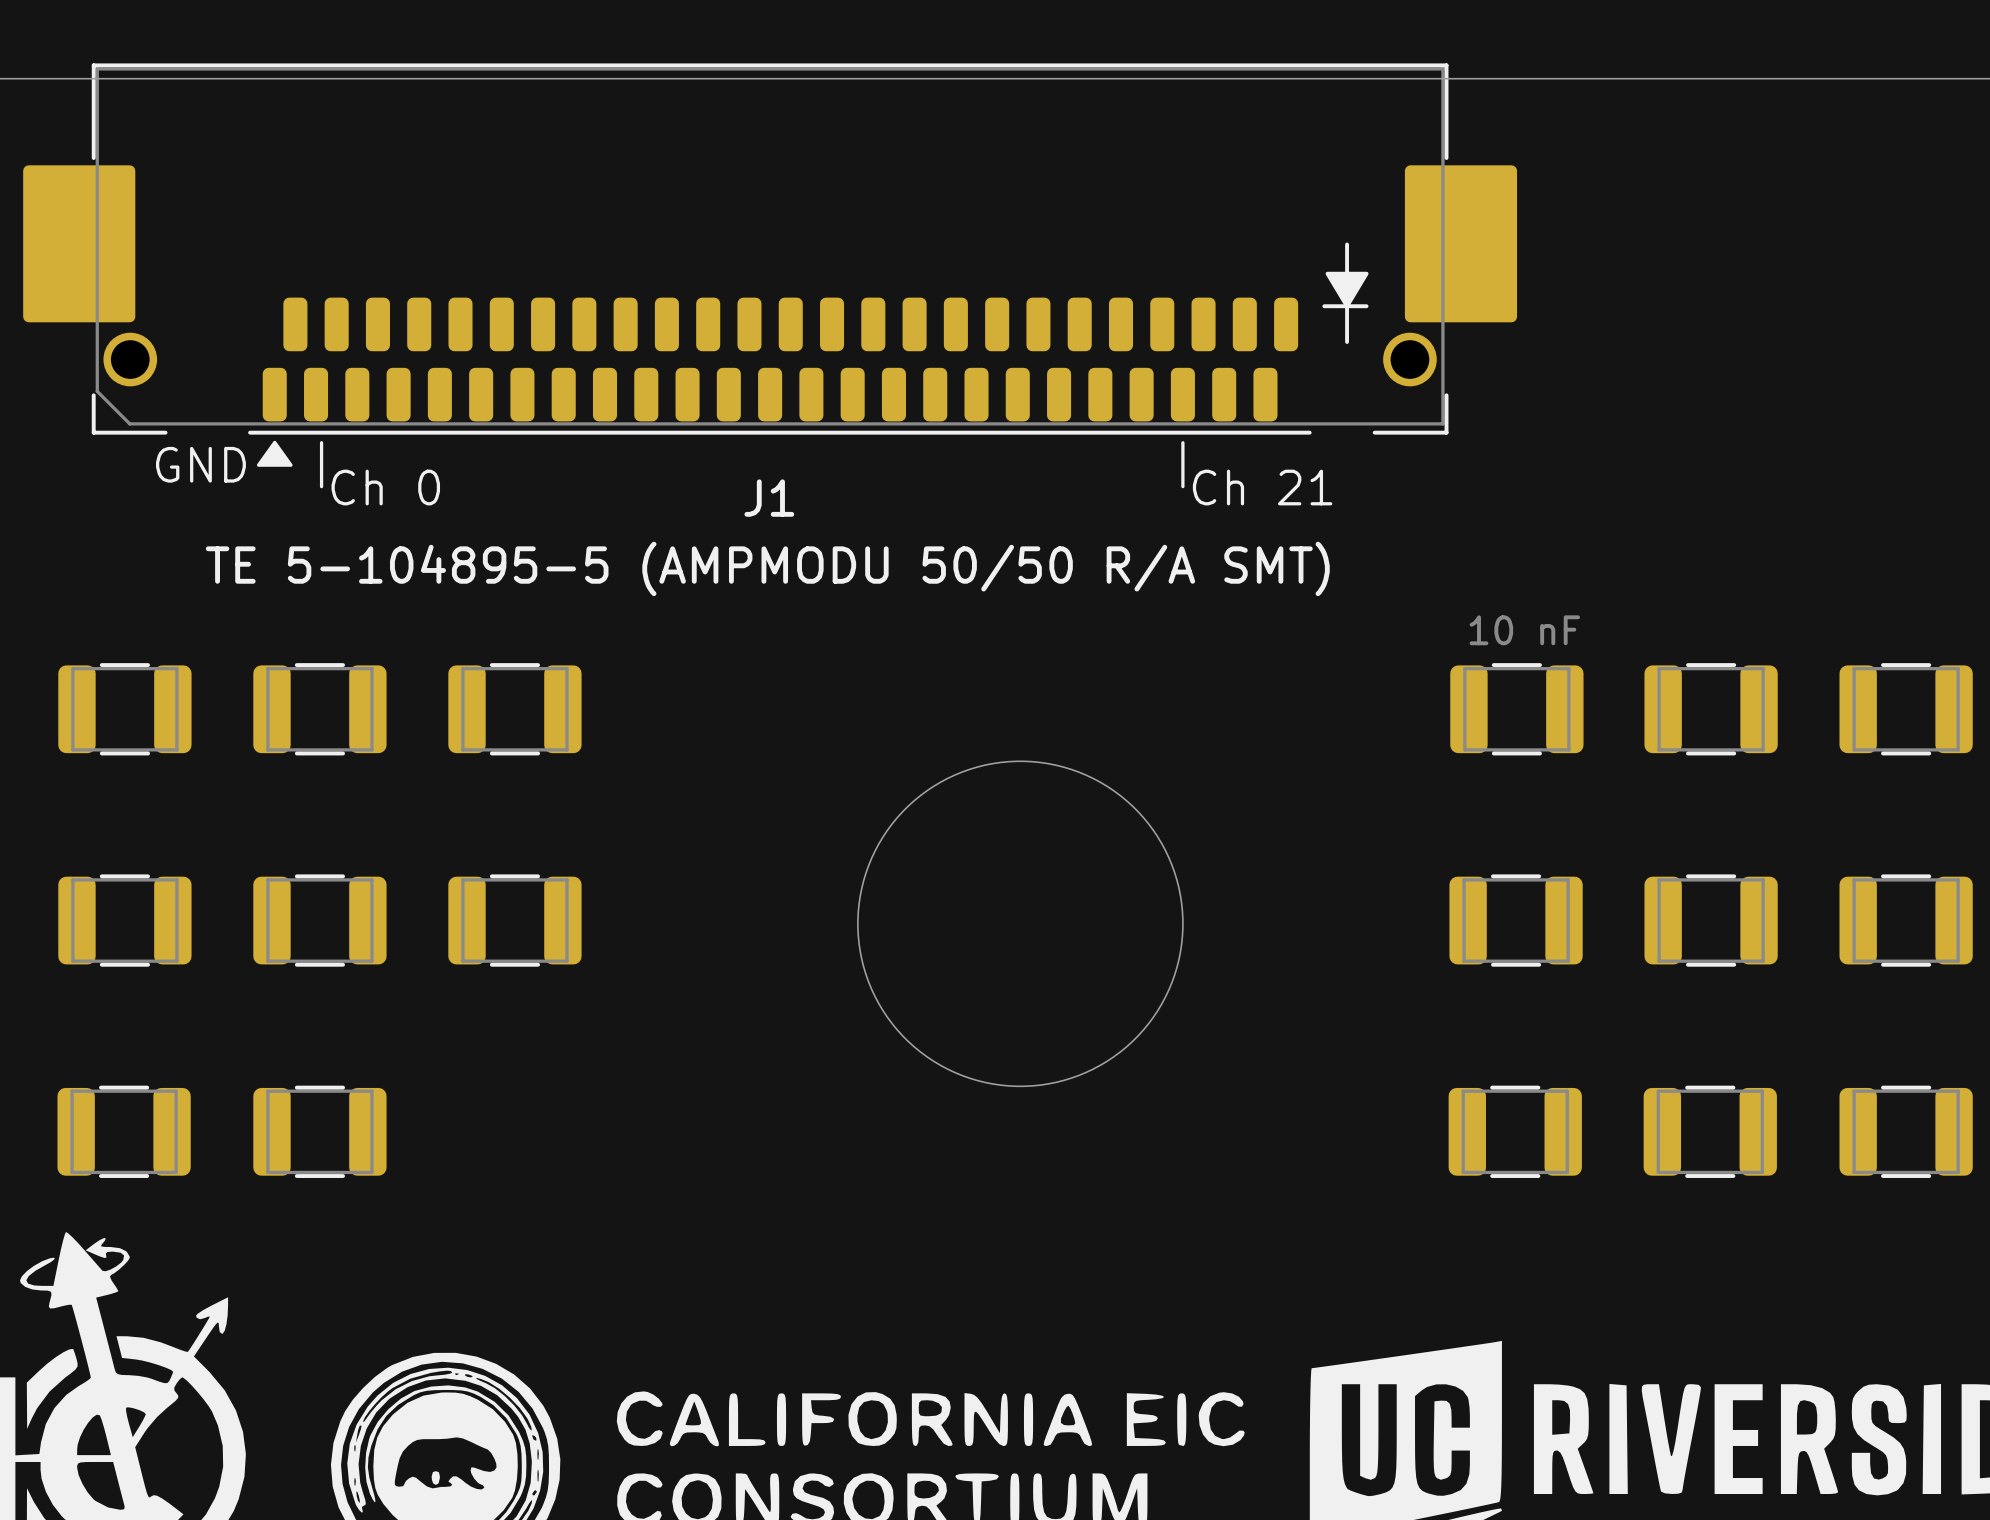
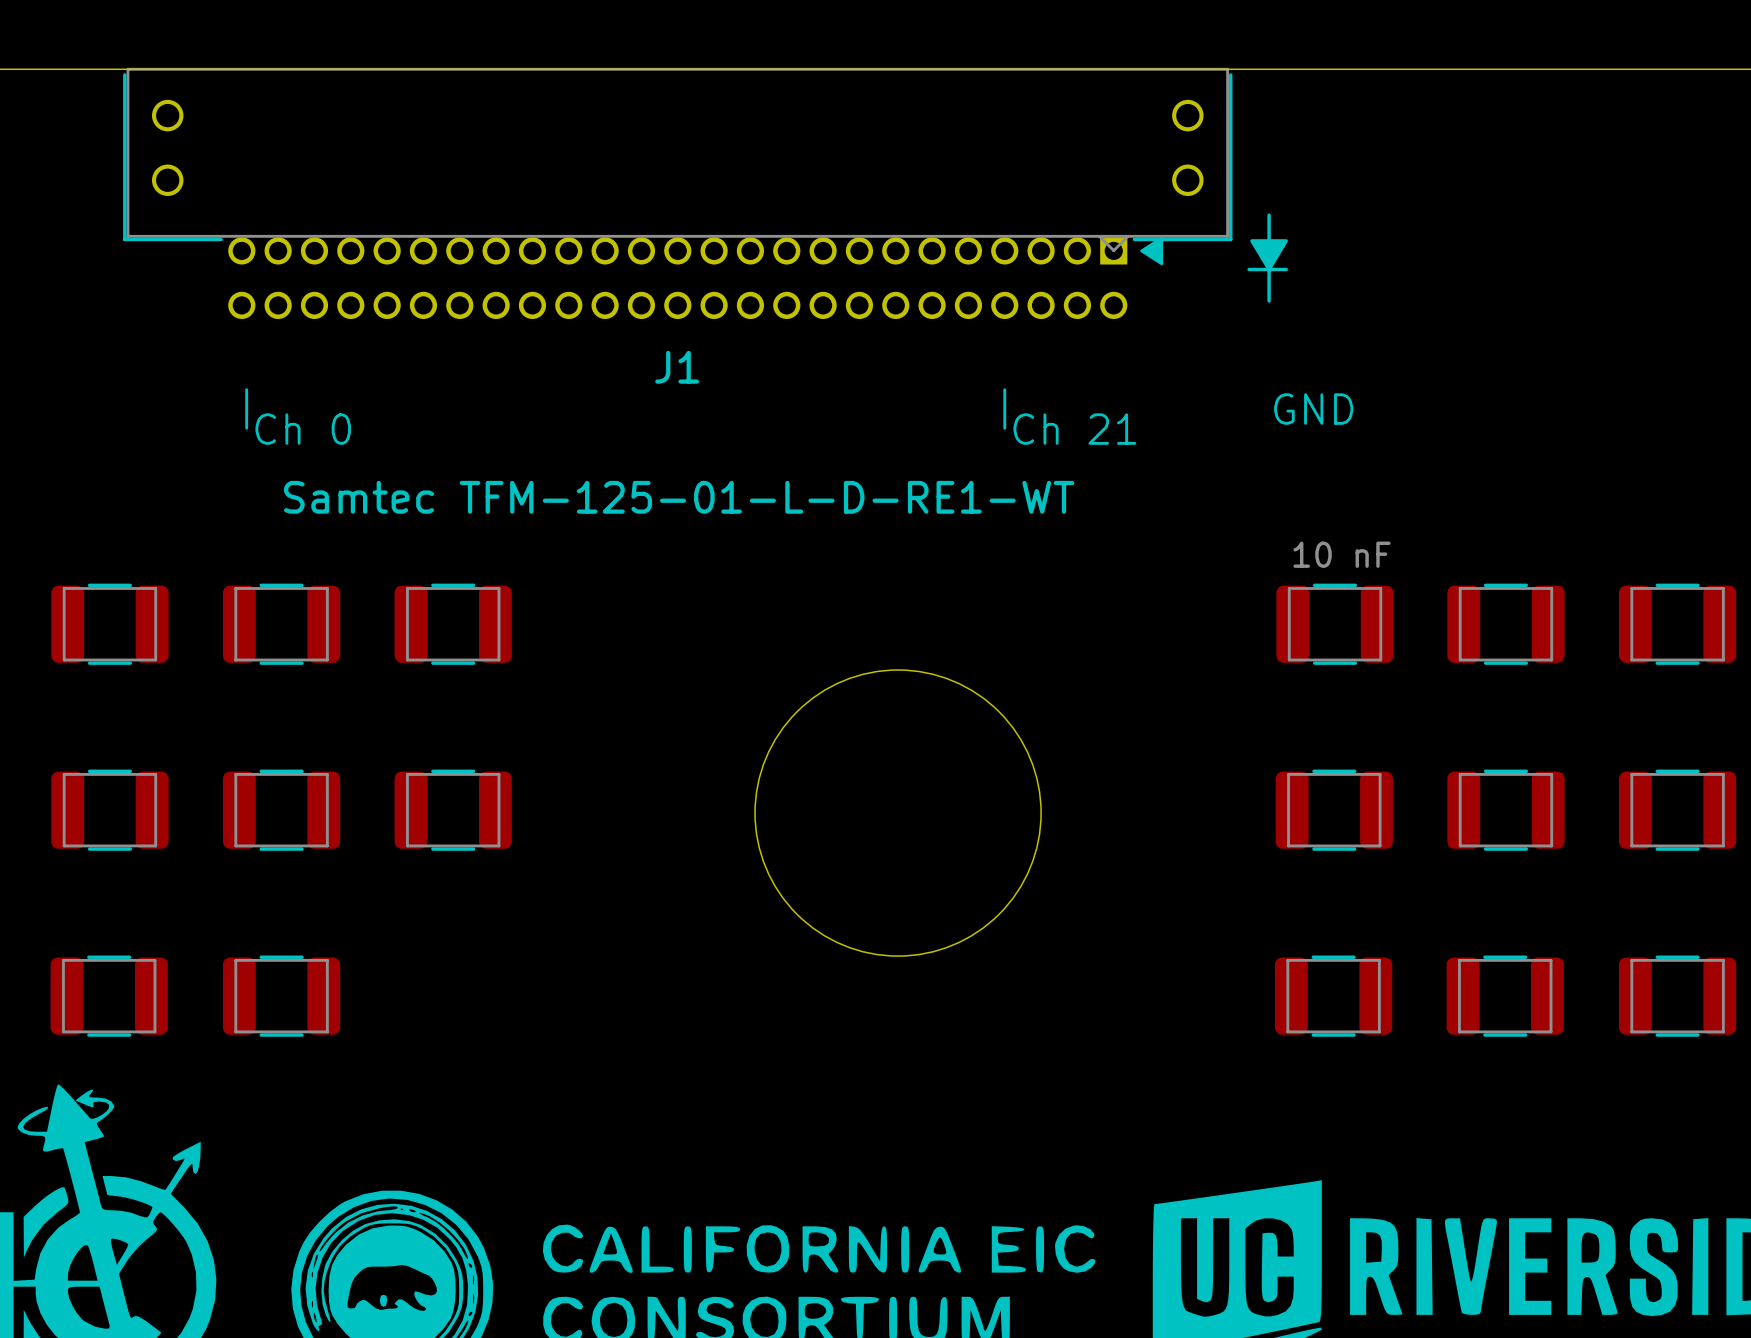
J1 footprint: [23, 63, 1518, 467] -> [123, 67, 1233, 320]
drawing position: (1345, 293) -> (1267, 258)
line: (321, 442) (321, 486) -> (246, 389) (246, 428)
line: (1182, 442) (1182, 486) -> (1004, 389) (1004, 428)
text: GND (200, 464) -> none
text: none -> GND (1313, 409)
text position: Ch 0 (385, 487) -> Ch 0 (303, 429)
text position: Ch 21 (1262, 487) -> Ch 21 (1074, 429)
text: TE 5-104895-5 (AMPMODU 50/50 R/A SMT) (767, 568) -> Samtec TFM-125-01-L-D-RE1-WT (679, 497)

